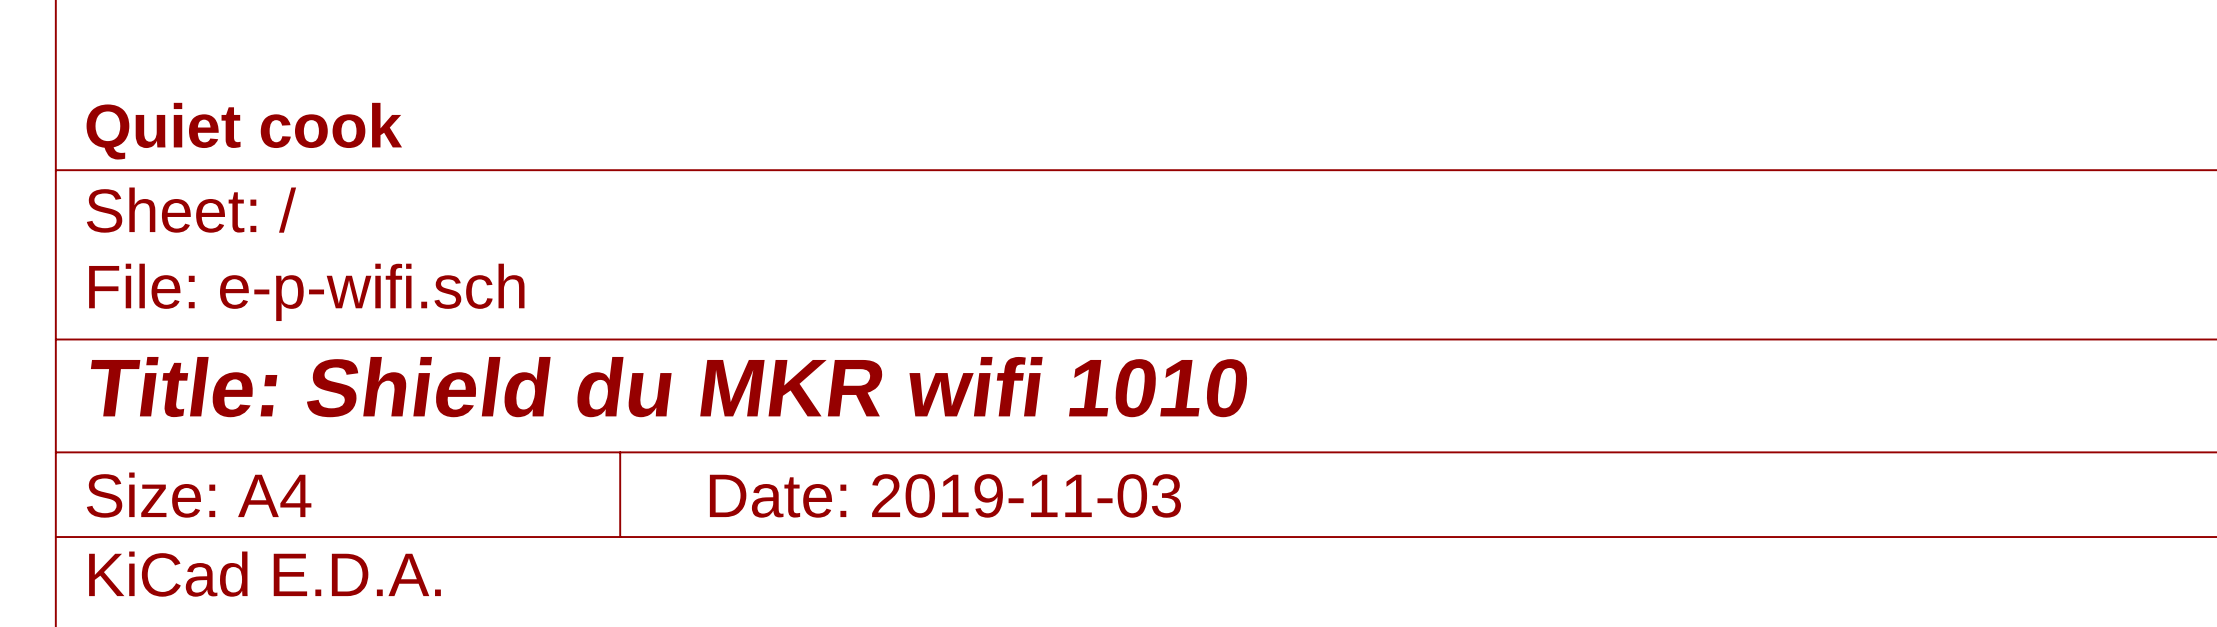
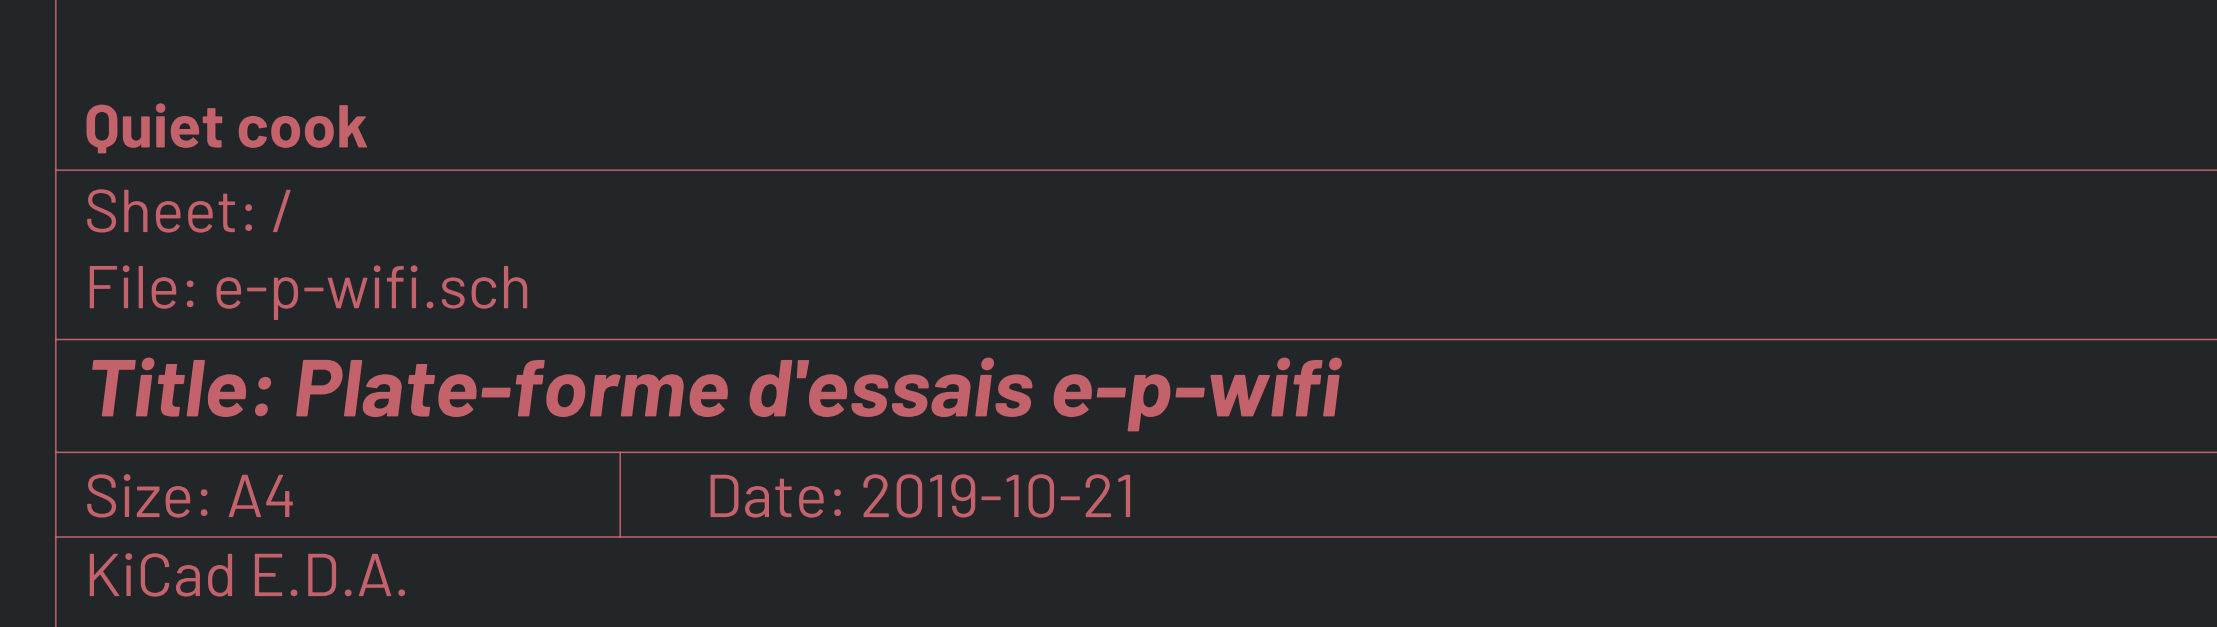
title block: Title: Shield du MKR wifi 1010 (669, 387) -> Title: Plate-forme d'essais e-p-wifi (717, 394)
title block: Date: 2019-11-03 (945, 495) -> Date: 2019-10-21 (920, 495)

